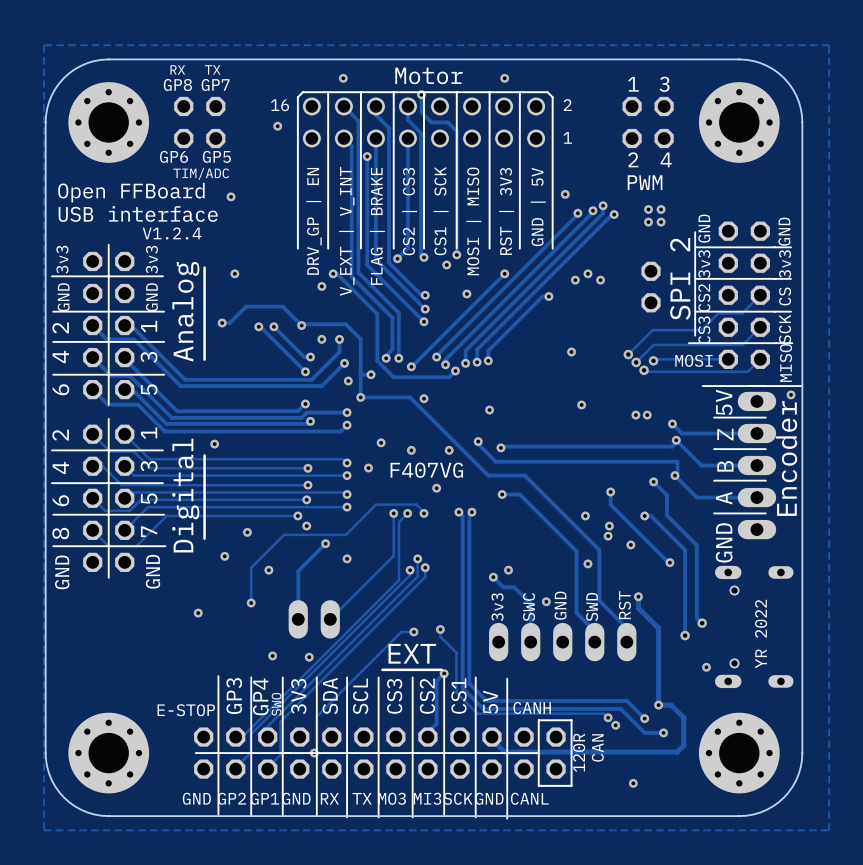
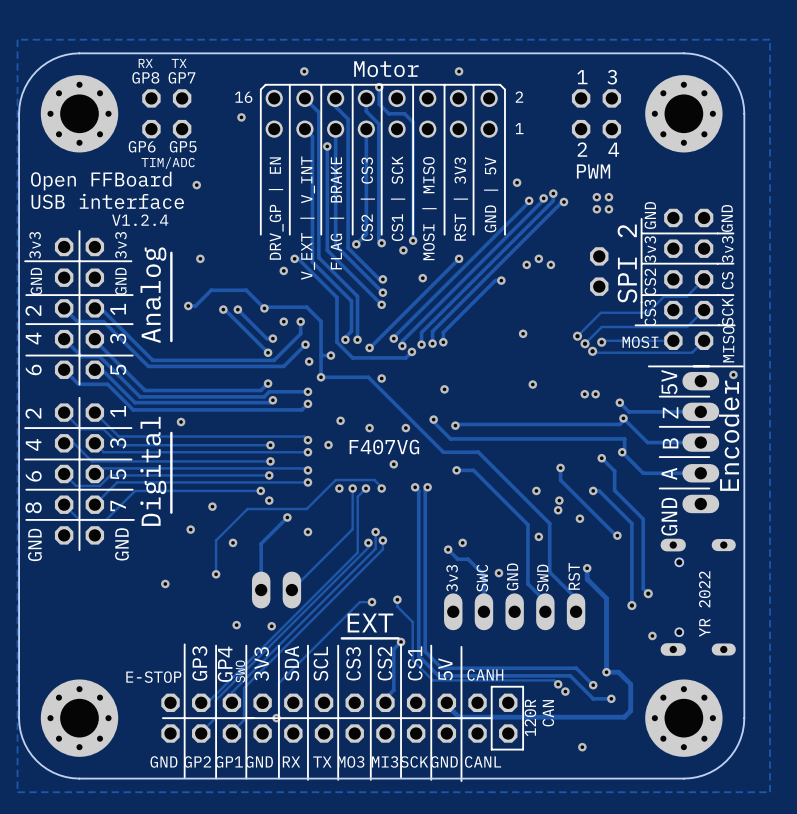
via: none -> (339, 488)

